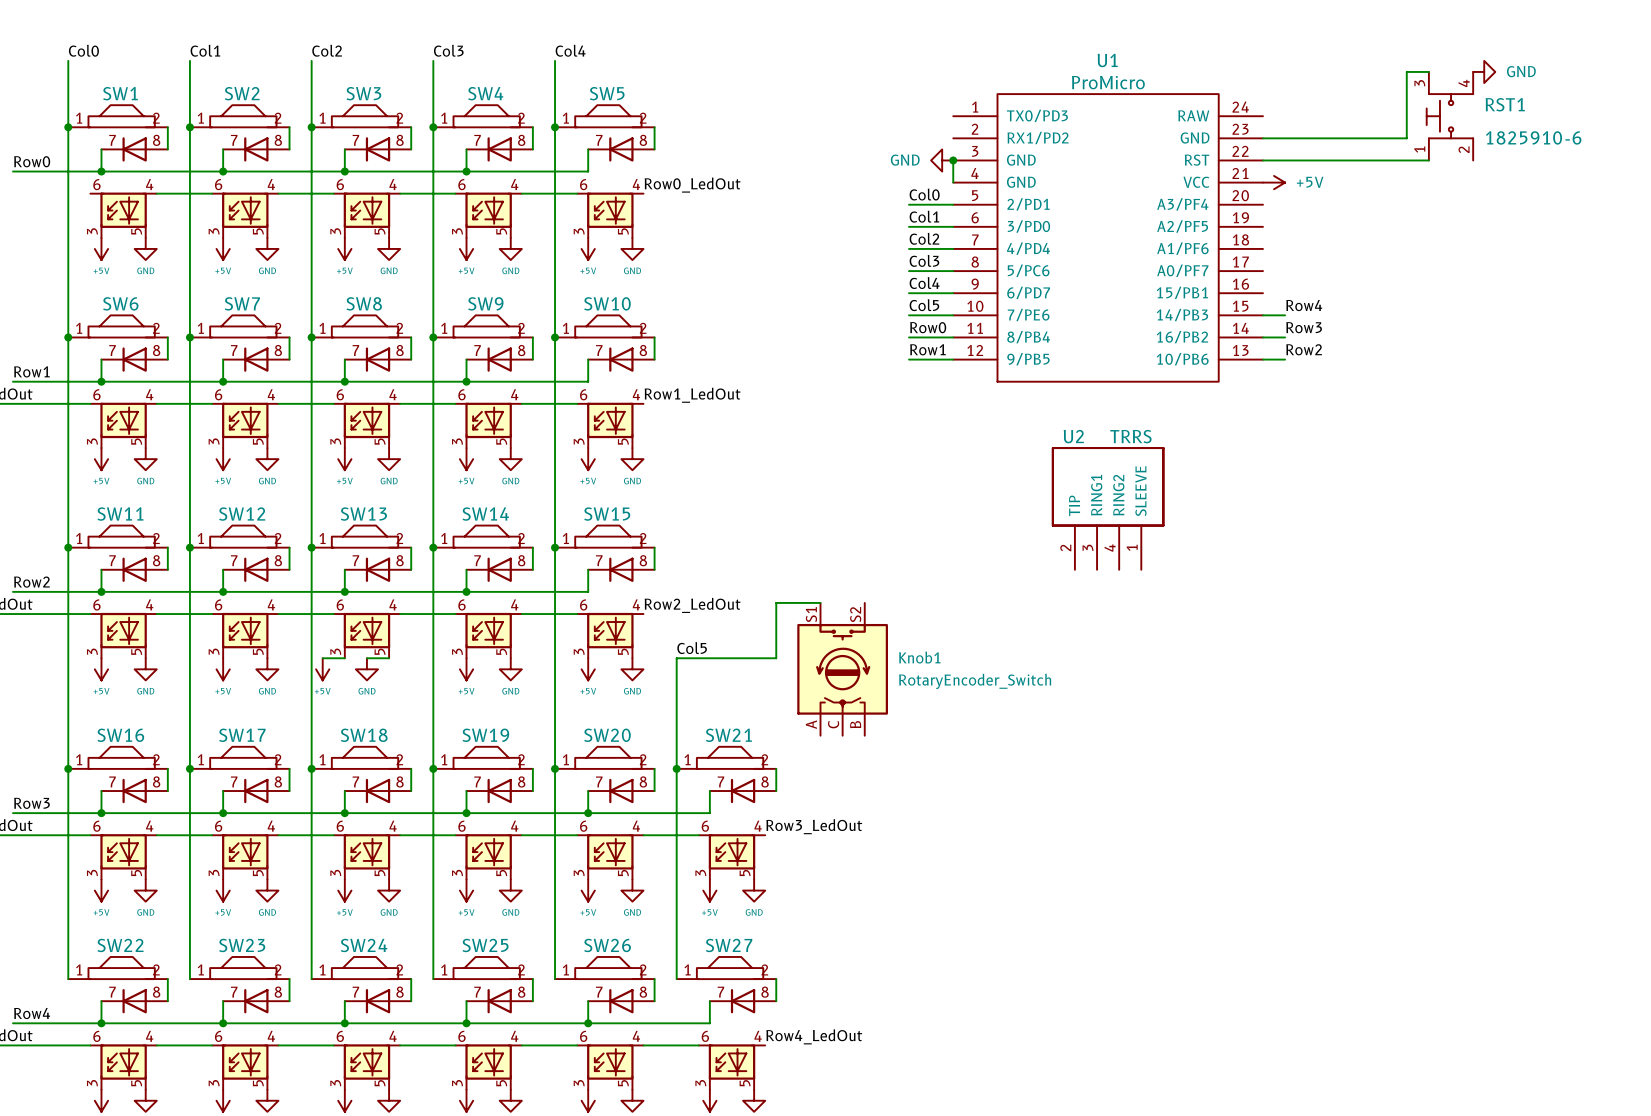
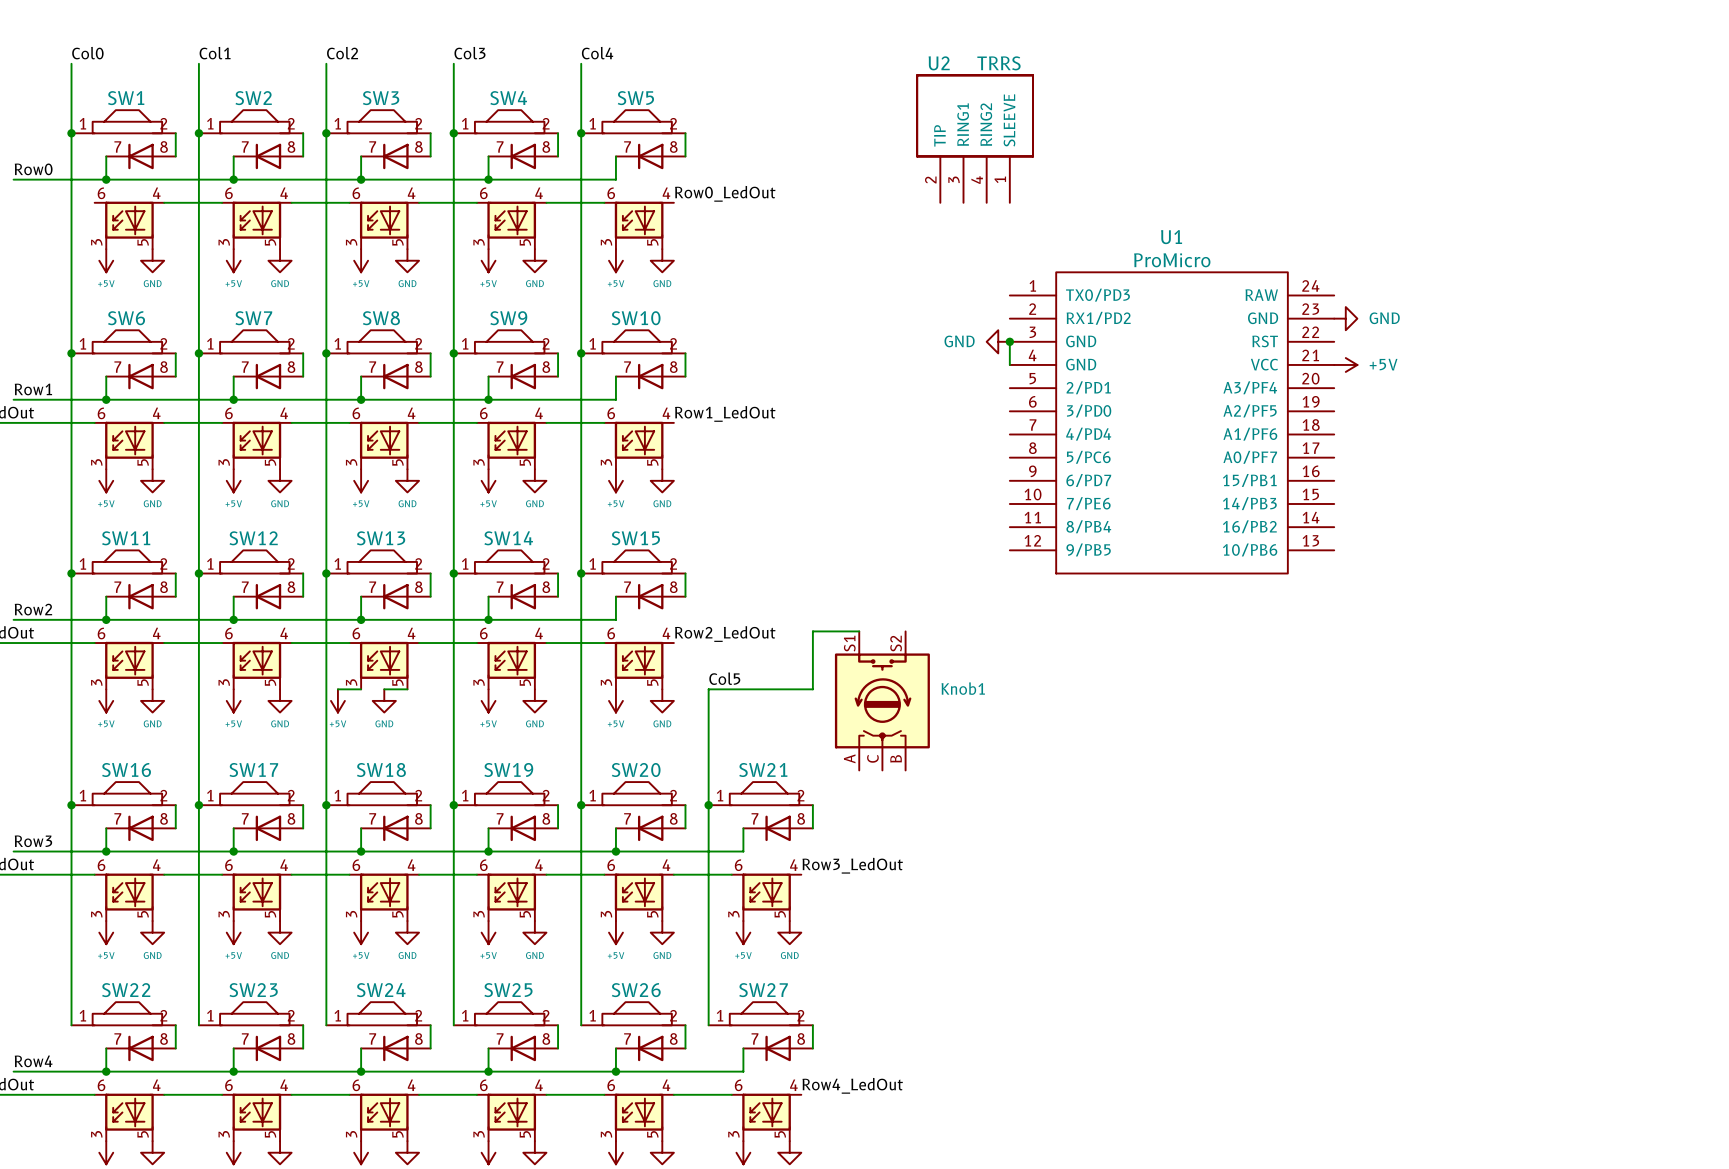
wire: (1428, 71) (1406, 71) (1406, 138) (1262, 138) -> none
power symbol: GND (1484, 71) -> none
RST1: 1825910-6 (1449, 116) -> none
power symbol position: GND (942, 160) -> GND (998, 341)
wire: (953, 160) (953, 182) -> (1009, 341) (1009, 364)
junction: (953, 160) -> none
wire: (1262, 160) (1428, 160) -> none
power symbol position: +5V (1274, 182) -> +5V (1345, 364)
label: Col0 (924, 194) -> none
wire: (909, 204) (953, 204) -> none
label: Col1 (924, 216) -> none
wire: (909, 226) (953, 226) -> none
U1 position: (1108, 237) -> (1172, 422)
label: Col2 (924, 238) -> none
wire: (909, 248) (953, 248) -> none
label: Col3 (924, 260) -> none
wire: (909, 271) (953, 271) -> none
label: Col4 (924, 283) -> none
wire: (909, 293) (953, 293) -> none
power symbol: none -> GND (1345, 318)
label: Col5 (924, 305) -> none
label: Row4 (1304, 305) -> none
wire: (909, 315) (953, 315) -> none
wire: (1262, 315) (1285, 315) -> none
junction: none -> (1009, 341)
label: Row0 (928, 327) -> none
label: Row3 (1304, 327) -> none
wire: (909, 337) (953, 337) -> none
wire: (1262, 337) (1285, 337) -> none
label: Row1 (927, 349) -> none
label: Row2 (1304, 349) -> none
wire: (909, 359) (953, 359) -> none
wire: (1262, 359) (1285, 359) -> none
U2 position: (1108, 508) -> (975, 139)
Knob1 value: RotaryEncoder_Switch (975, 681) -> none

